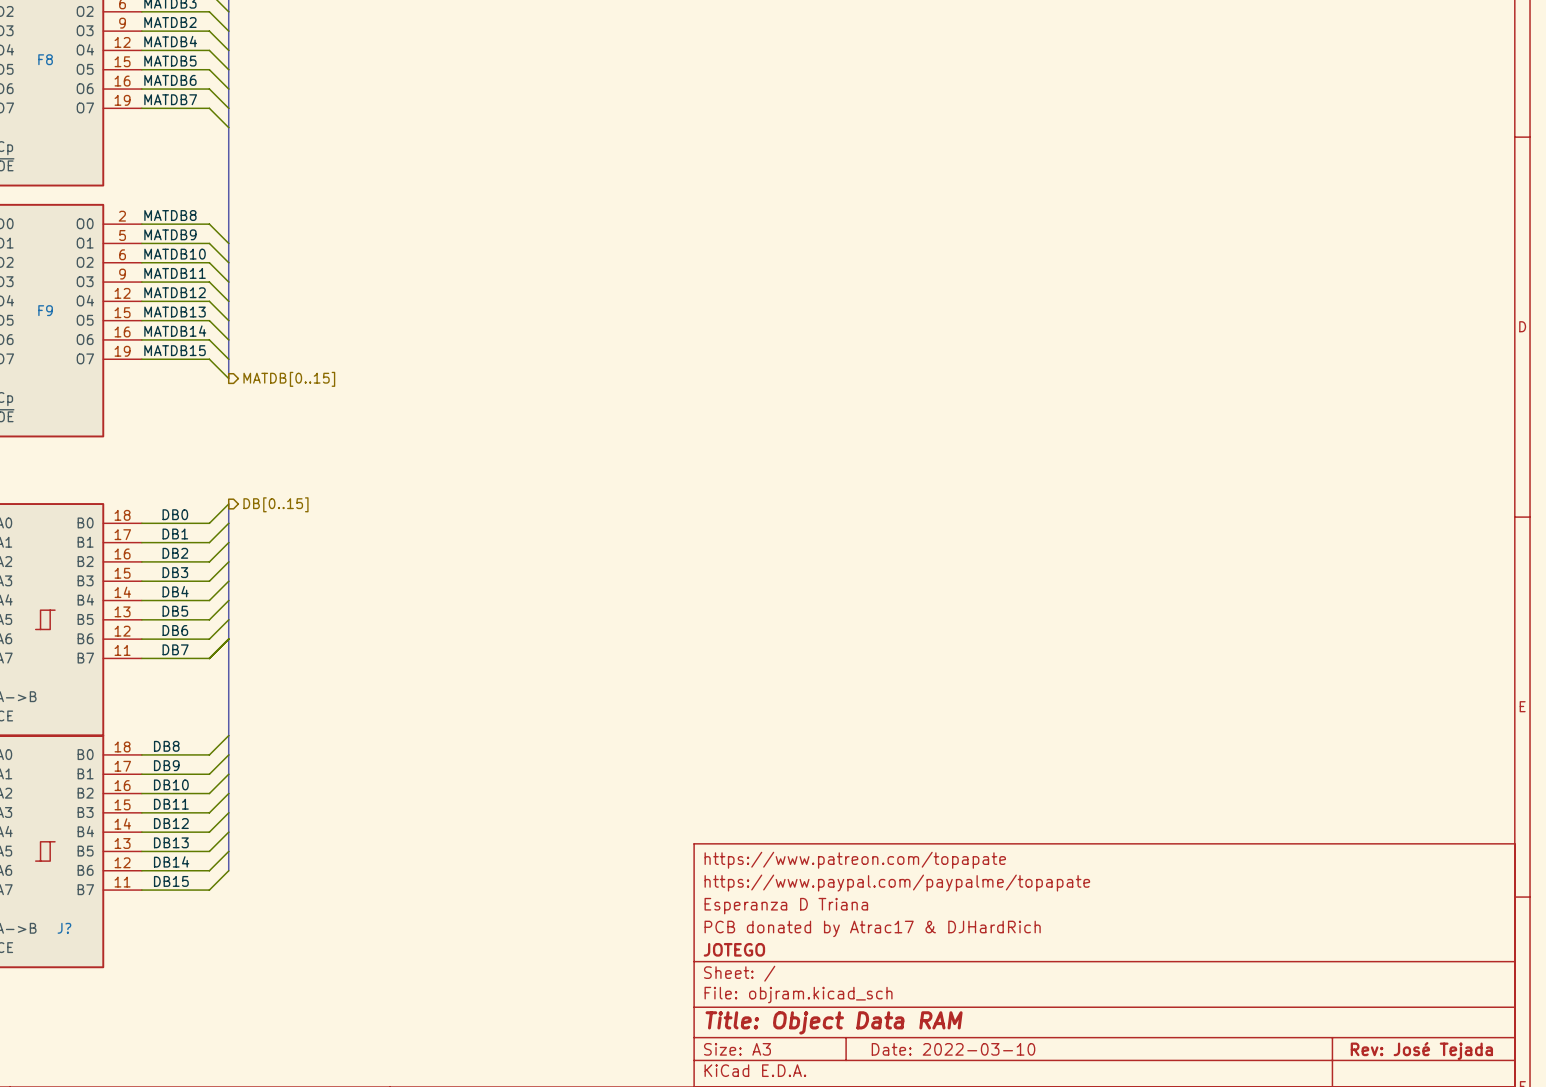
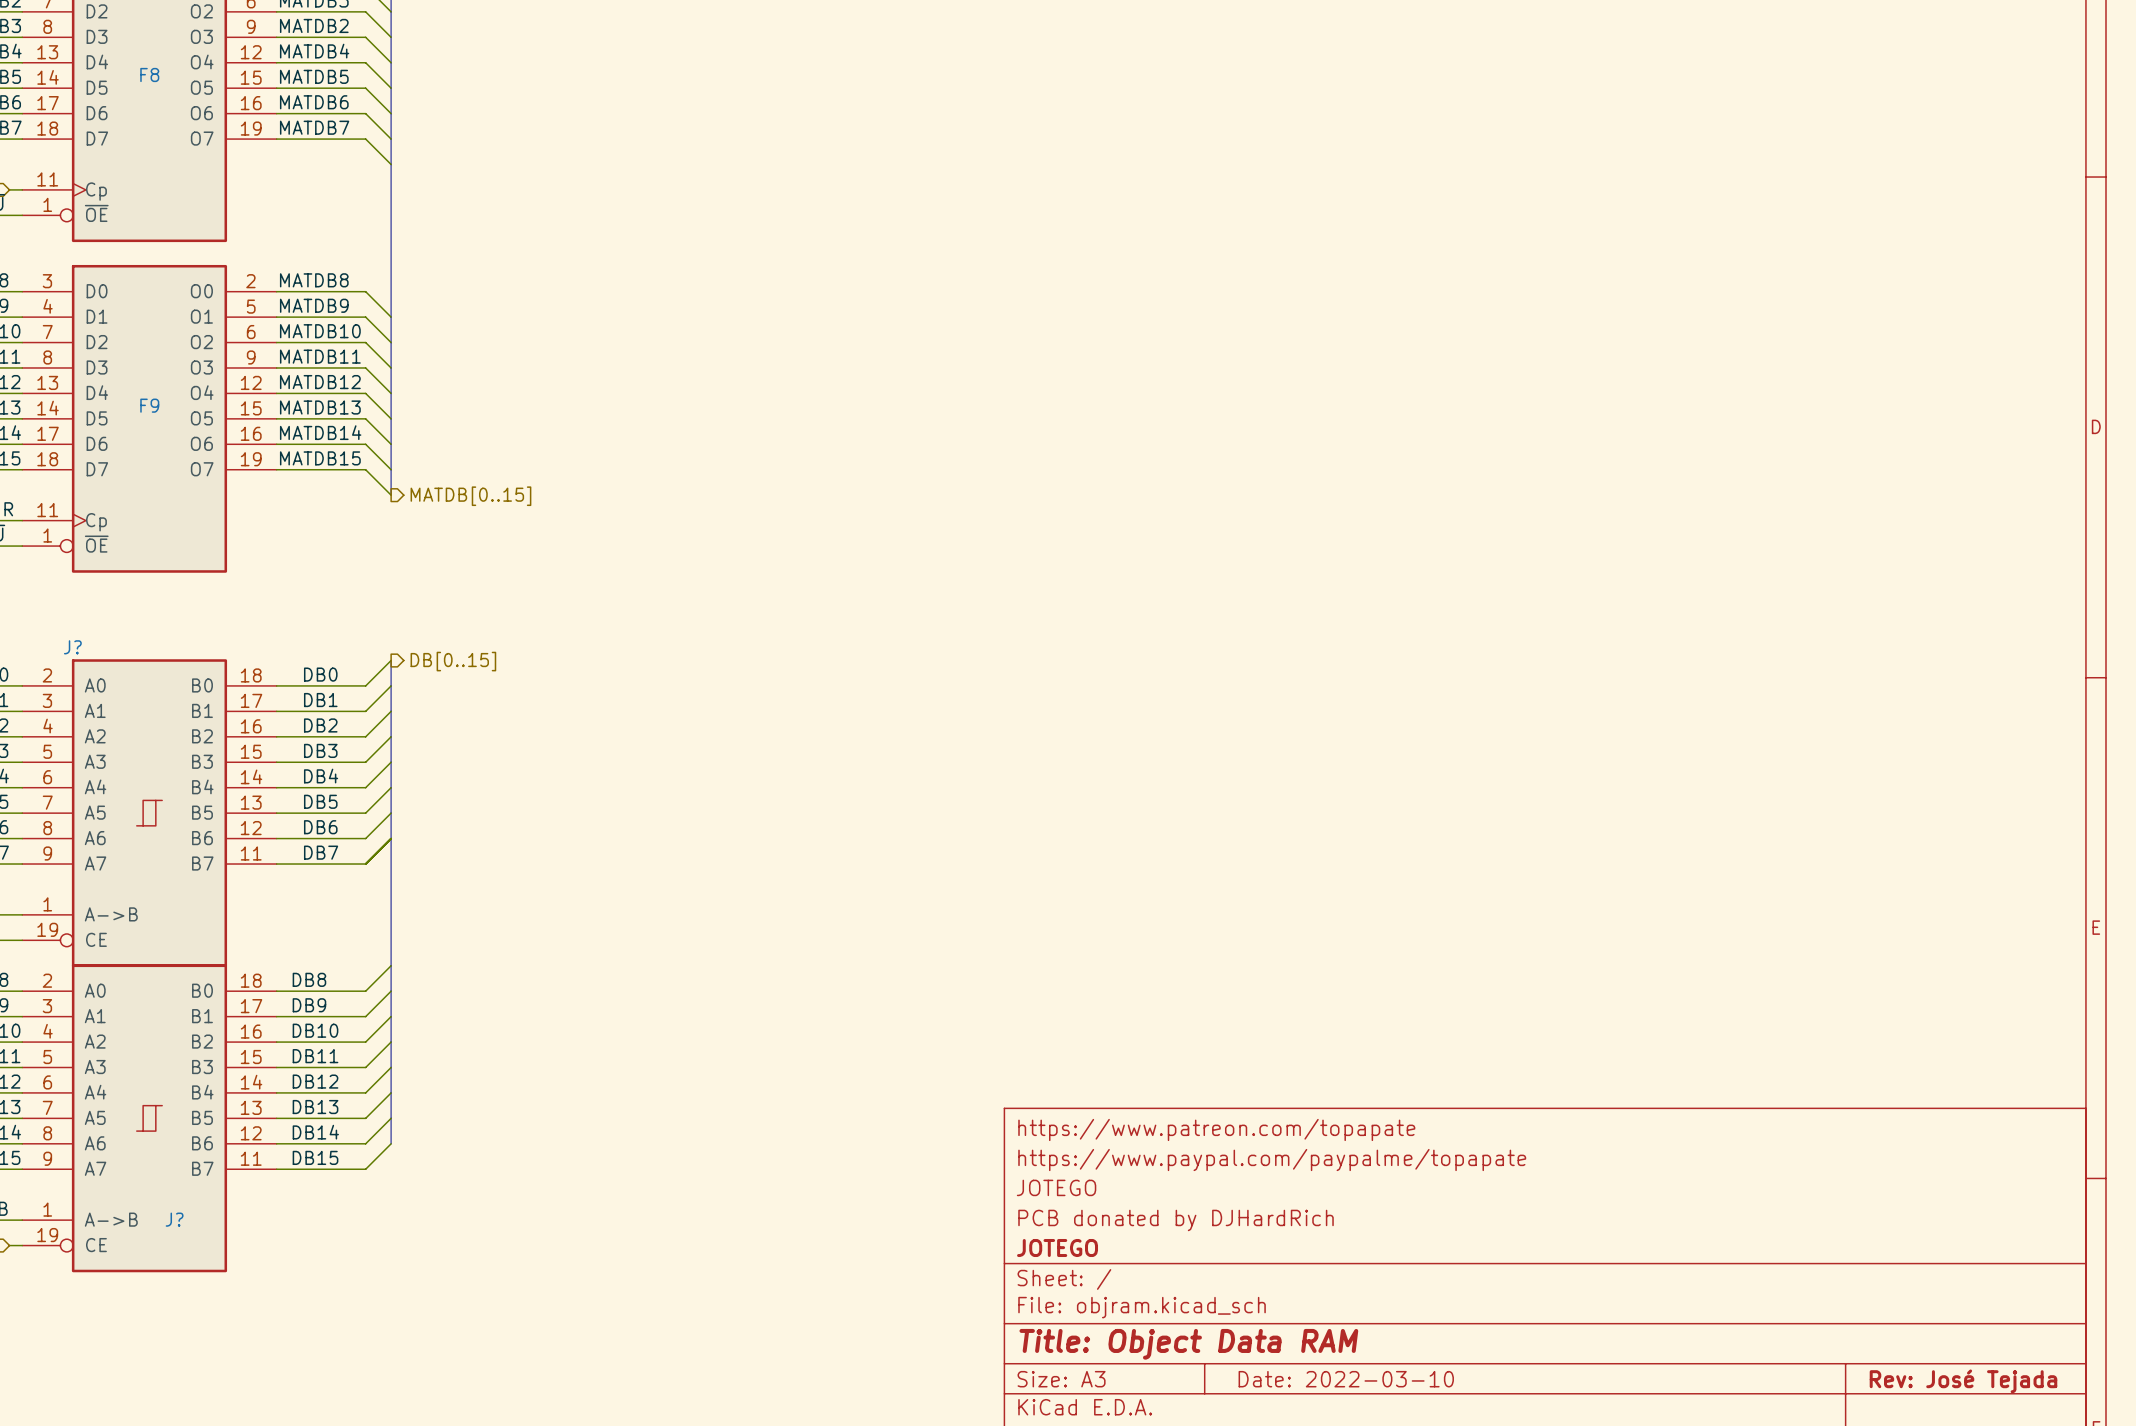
title block: Esperanza D Triana (786, 906) -> JOTEGO (1056, 1187)
title block: PCB donated by Atrac17 & DJHardRich (872, 928) -> PCB donated by DJHardRich (1176, 1220)

